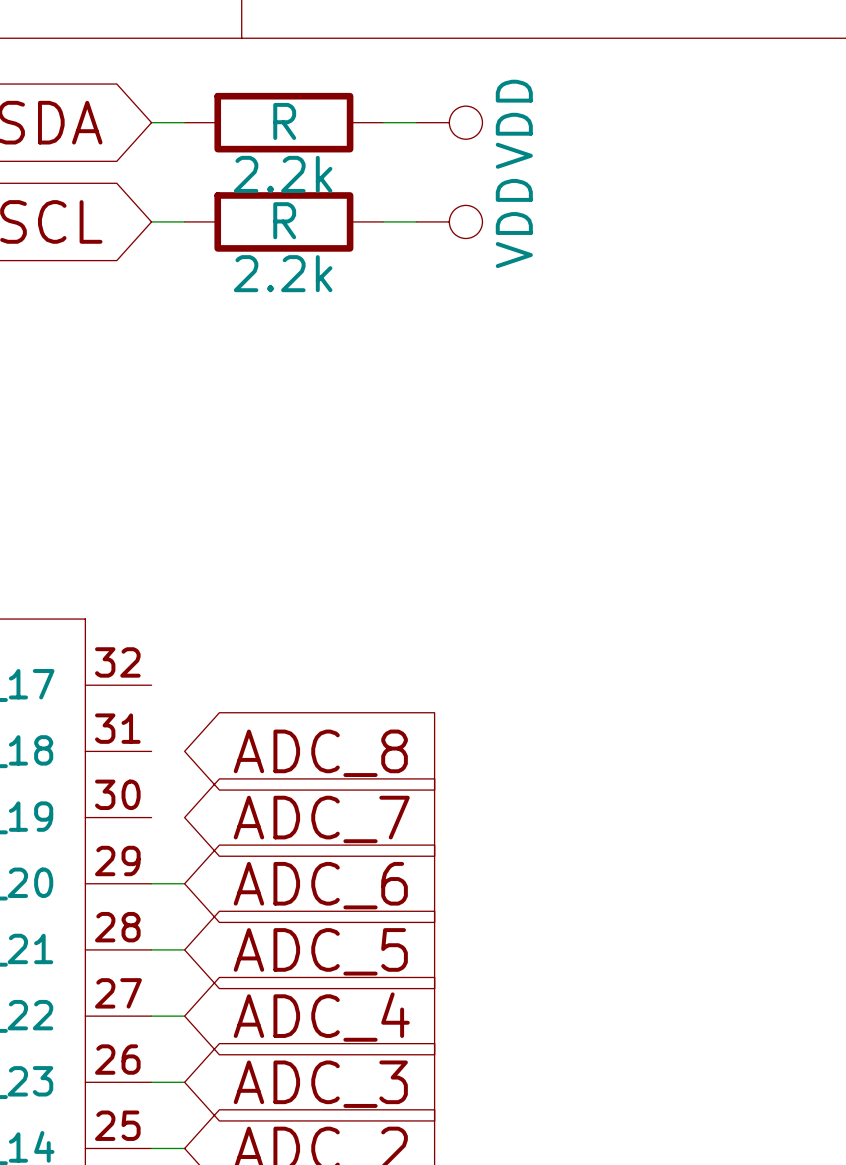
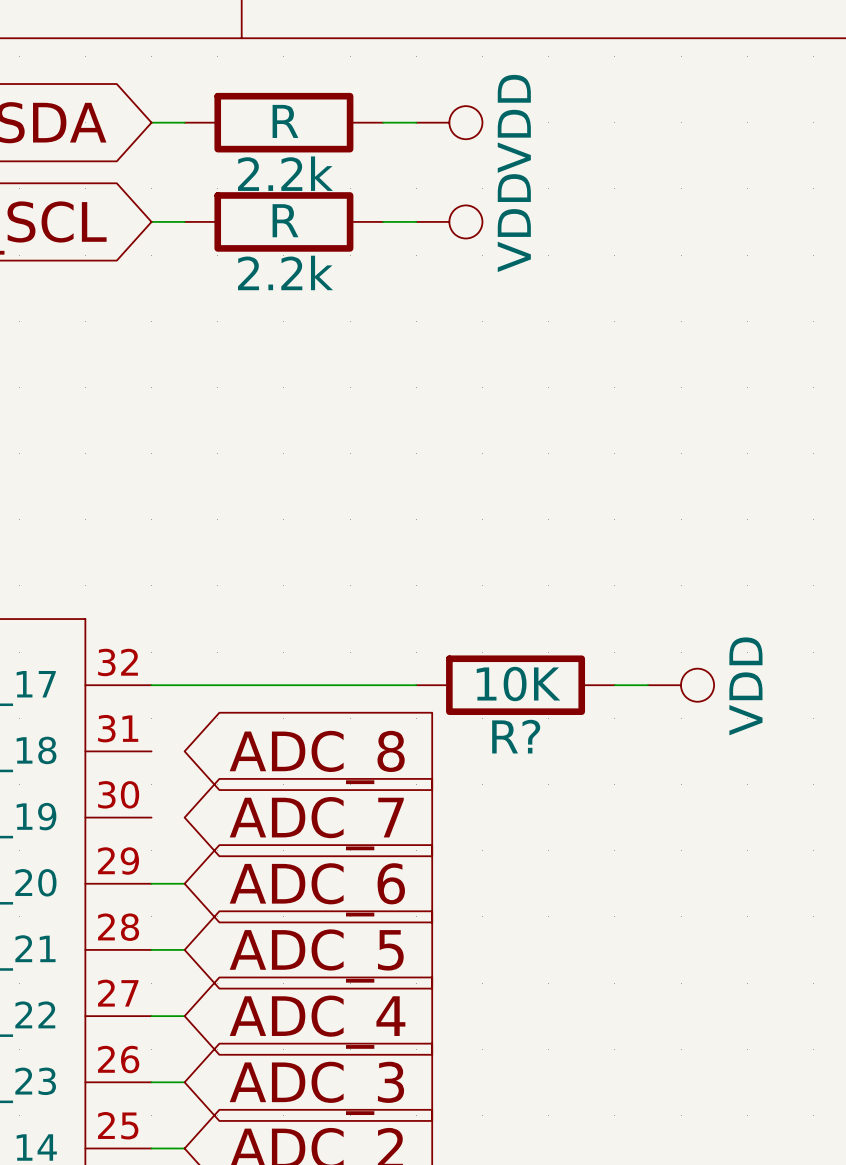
wire: none -> (151, 685) (416, 685)
R?: none -> 10K (515, 685)
wire: none -> (614, 685) (647, 685)
power symbol: none -> VDD (681, 685)

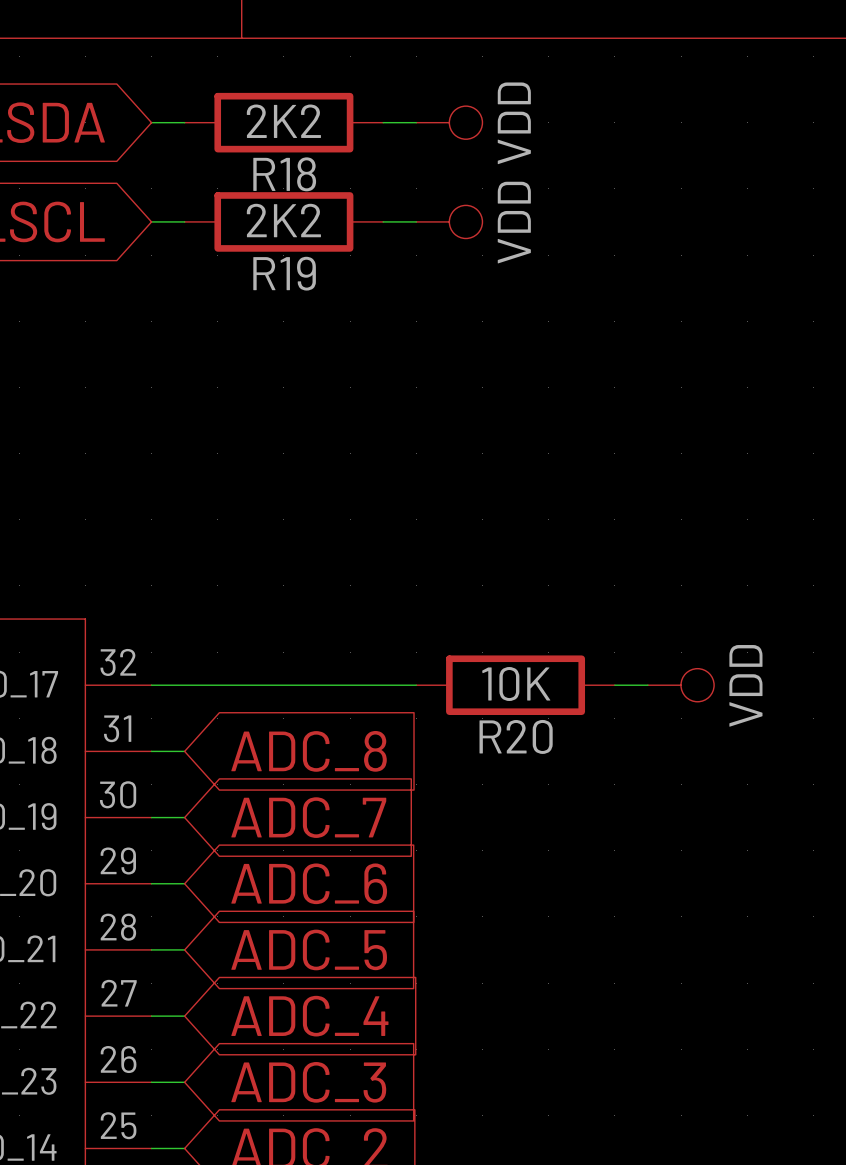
2.2k value: R (285, 121) -> 2K2 (283, 121)
2.2k name: 2.2k (285, 173) -> R18 (284, 174)
2.2k value: R (285, 220) -> 2K2 (283, 220)
2.2k name: 2.2k (285, 272) -> R19 (284, 273)
R? name: R? (516, 736) -> R20 (516, 736)
wire: none -> (151, 751) (184, 751)
wire: none -> (151, 817) (184, 817)

